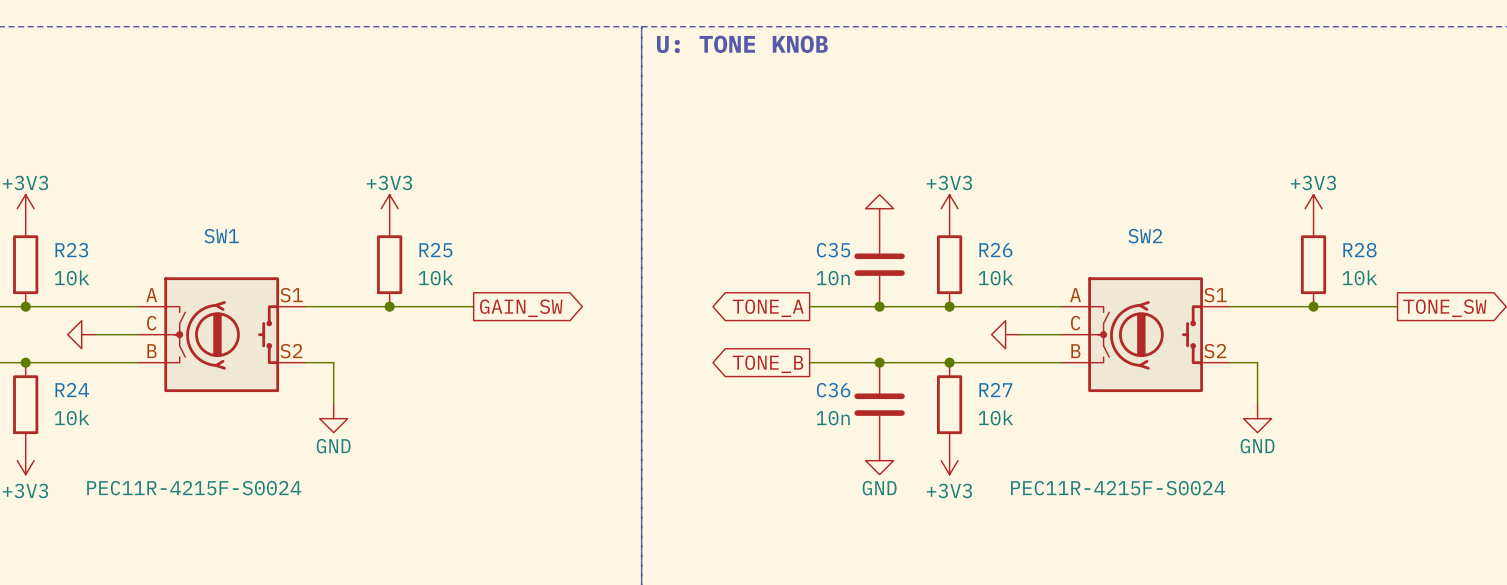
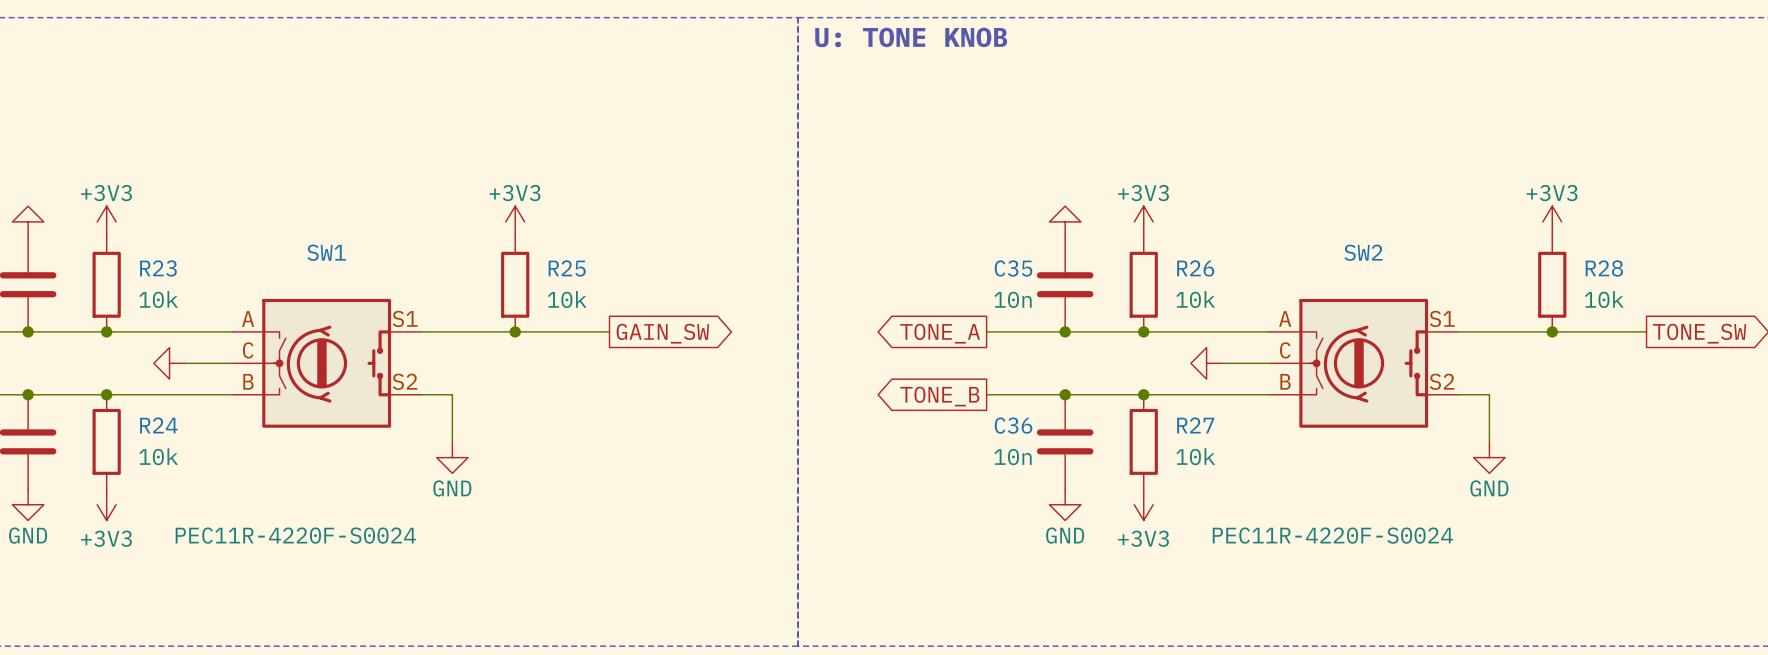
SW1 value: PEC11R-4215F-S0024 (194, 488) -> PEC11R-4220F-S0024 (295, 535)
SW2 value: PEC11R-4215F-S0024 (1118, 488) -> PEC11R-4220F-S0024 (1332, 535)

